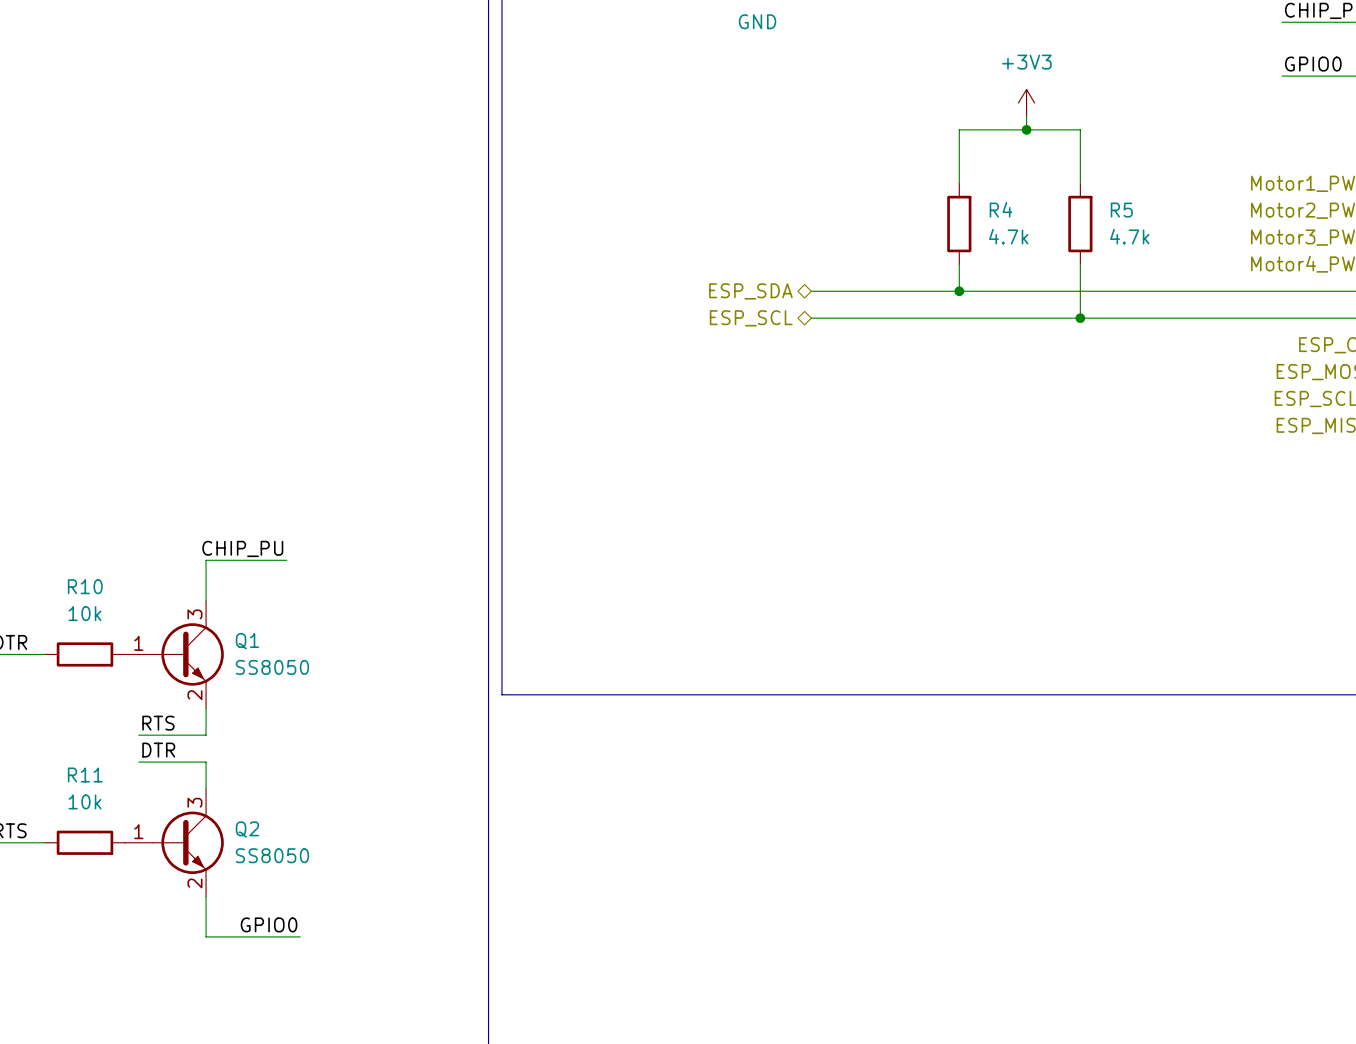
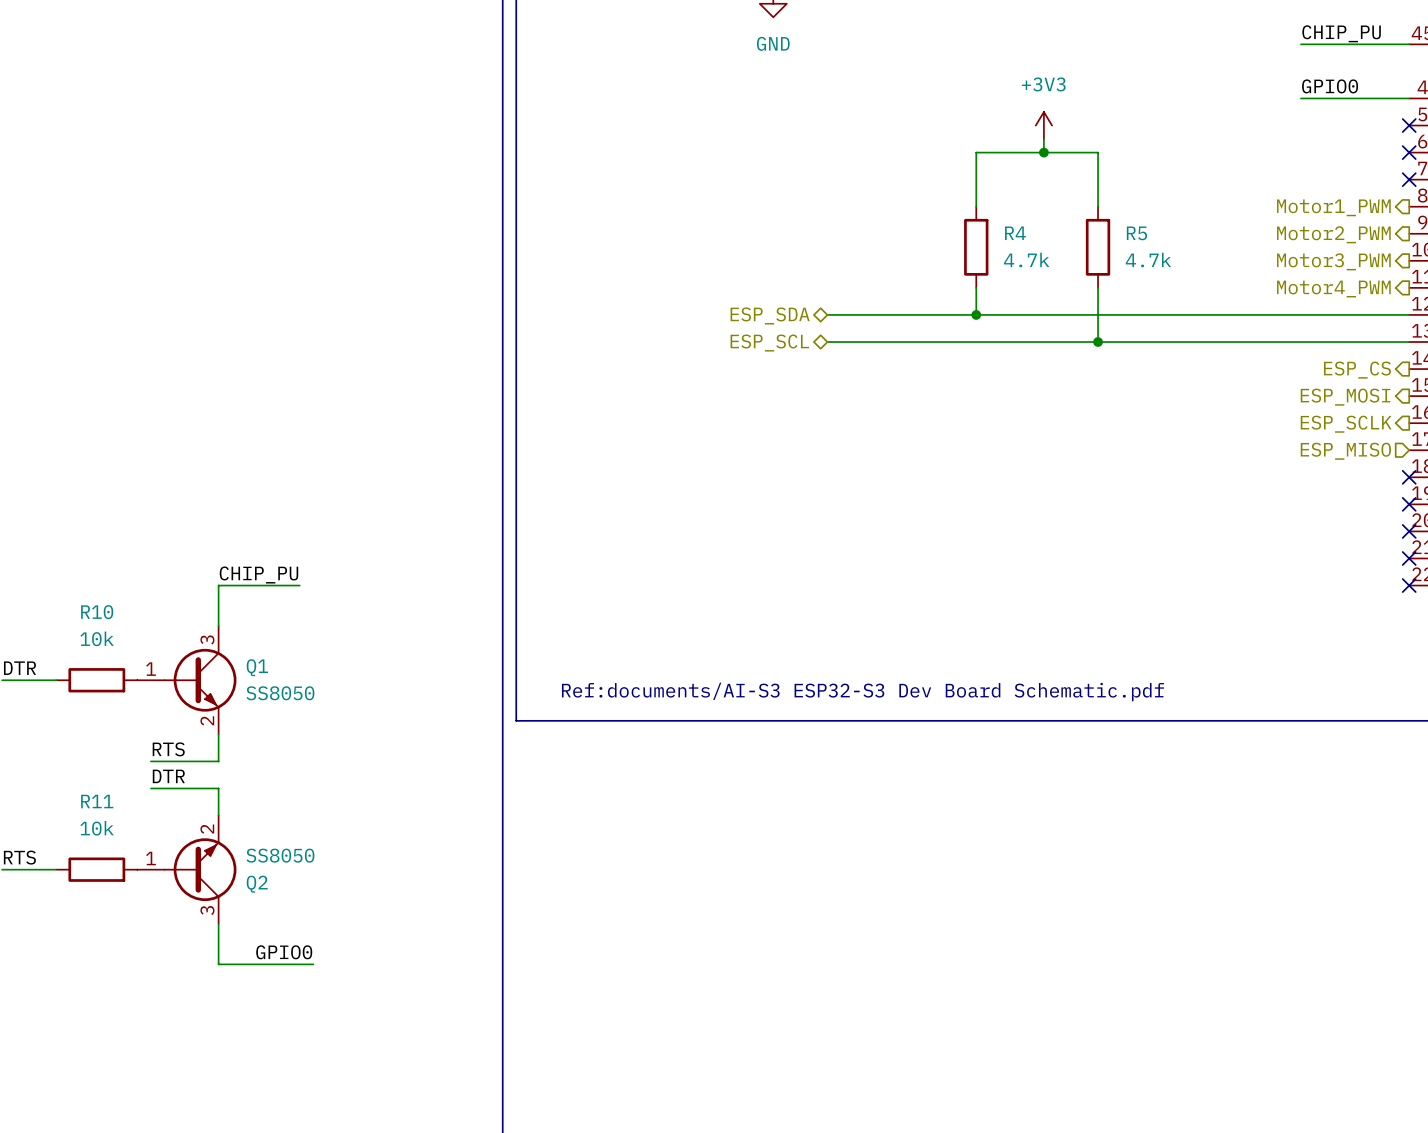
text: none -> Ref:documents/AI-S3 ESP32-S3 Dev Board Schematic.pdf (862, 691)
Q2 flip: as is (188, 842) -> up-down (200, 869)

